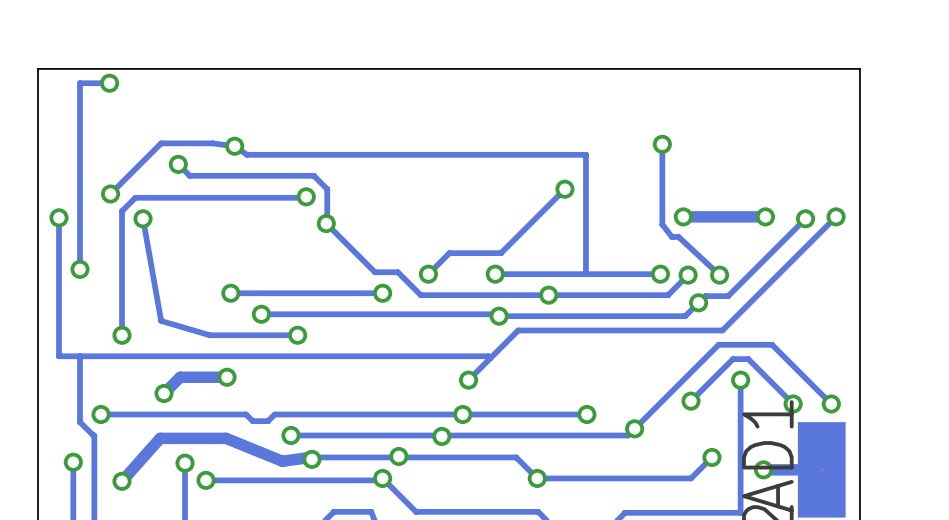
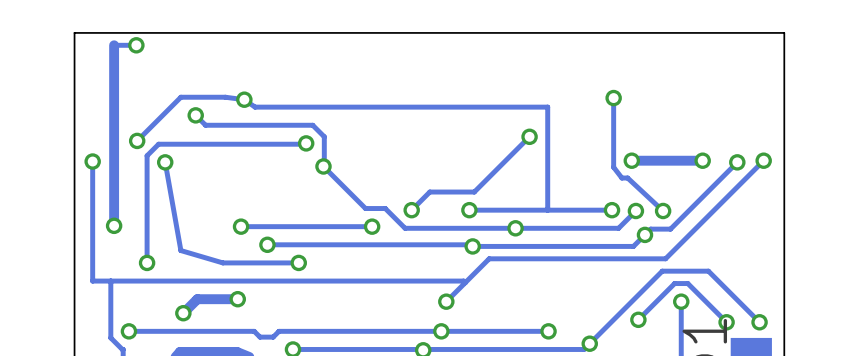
track: (83, 83) (80, 83) (80, 269) -> (114, 45) (114, 225)
via position: (80, 269) -> (114, 225)

